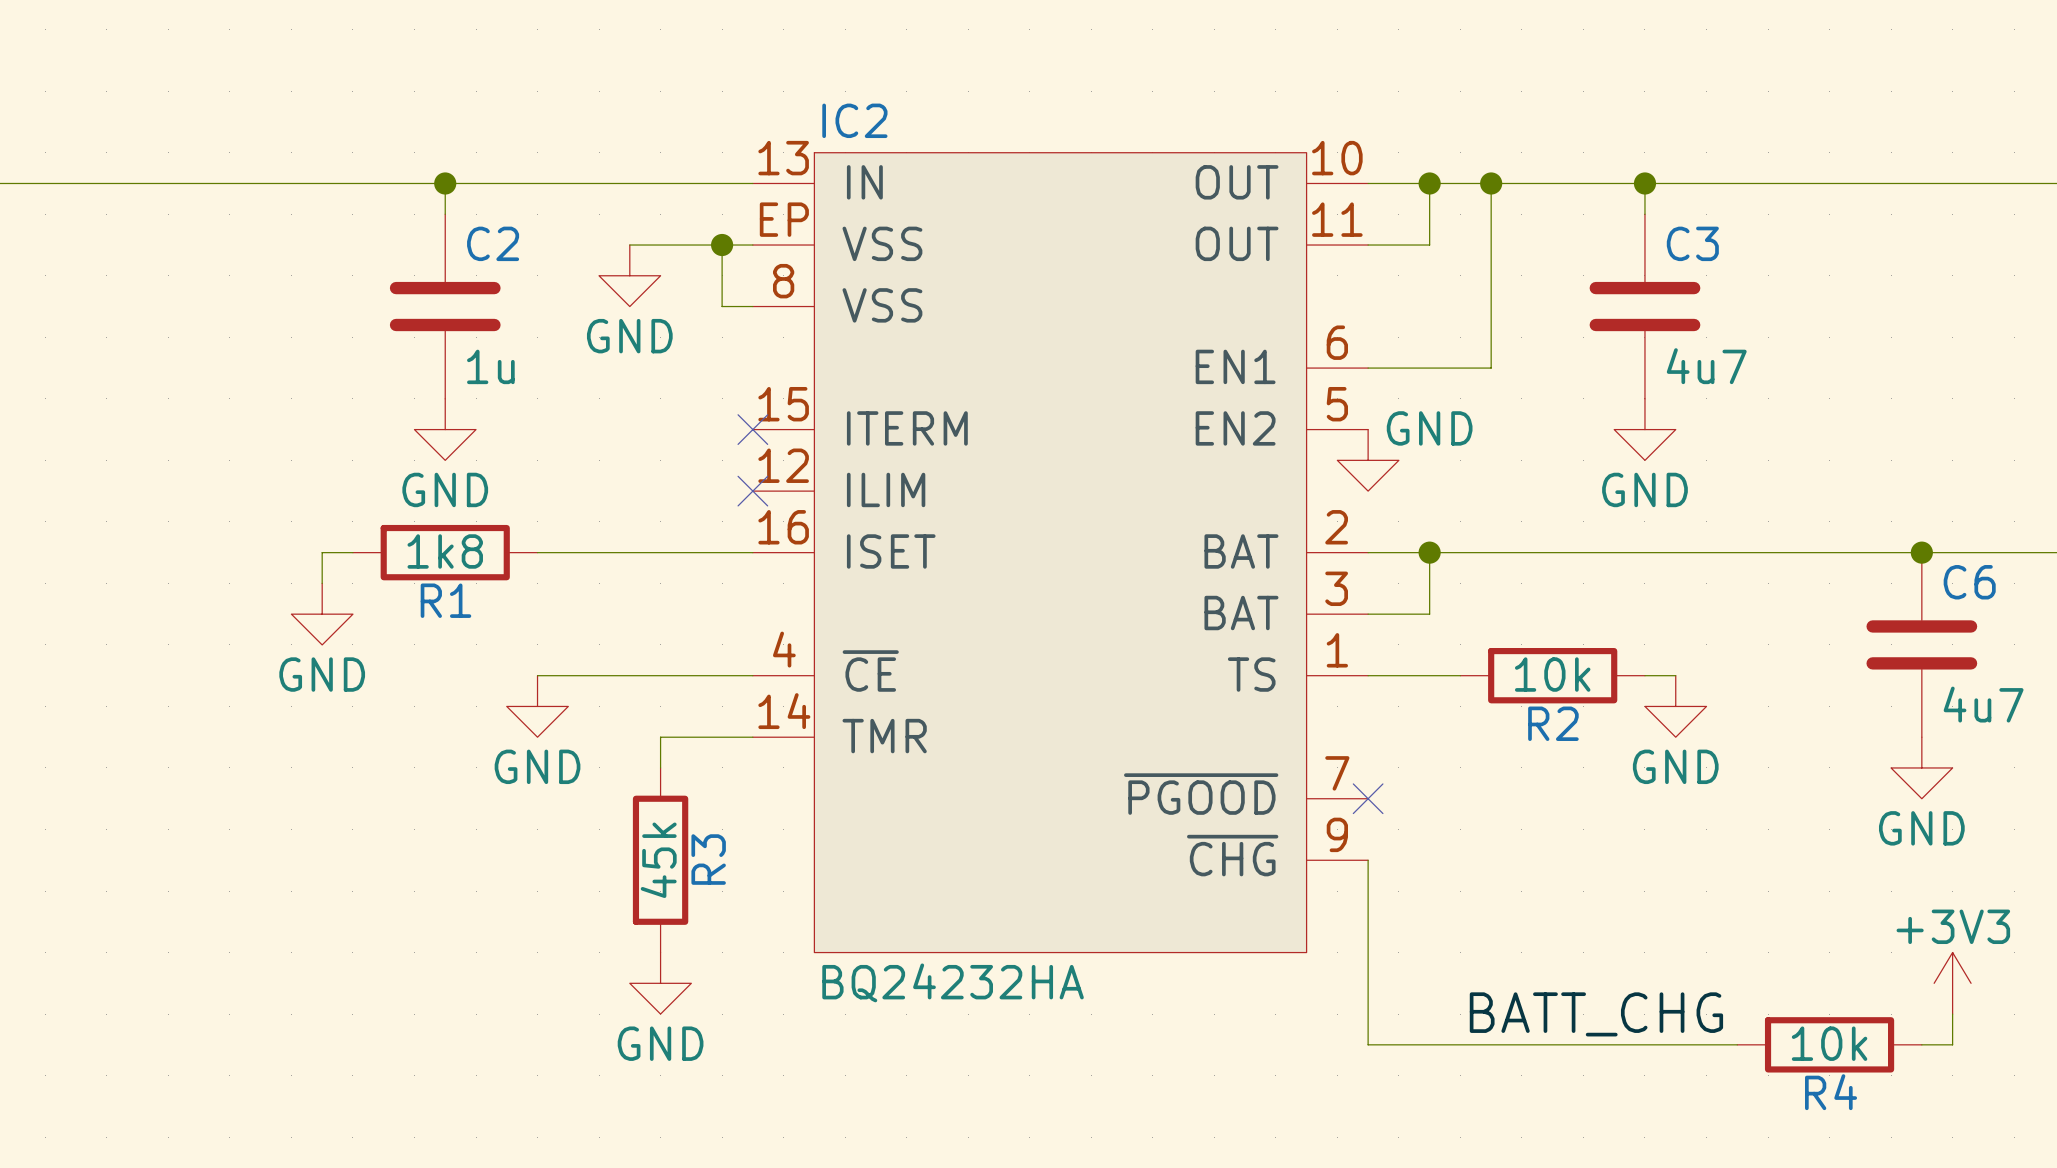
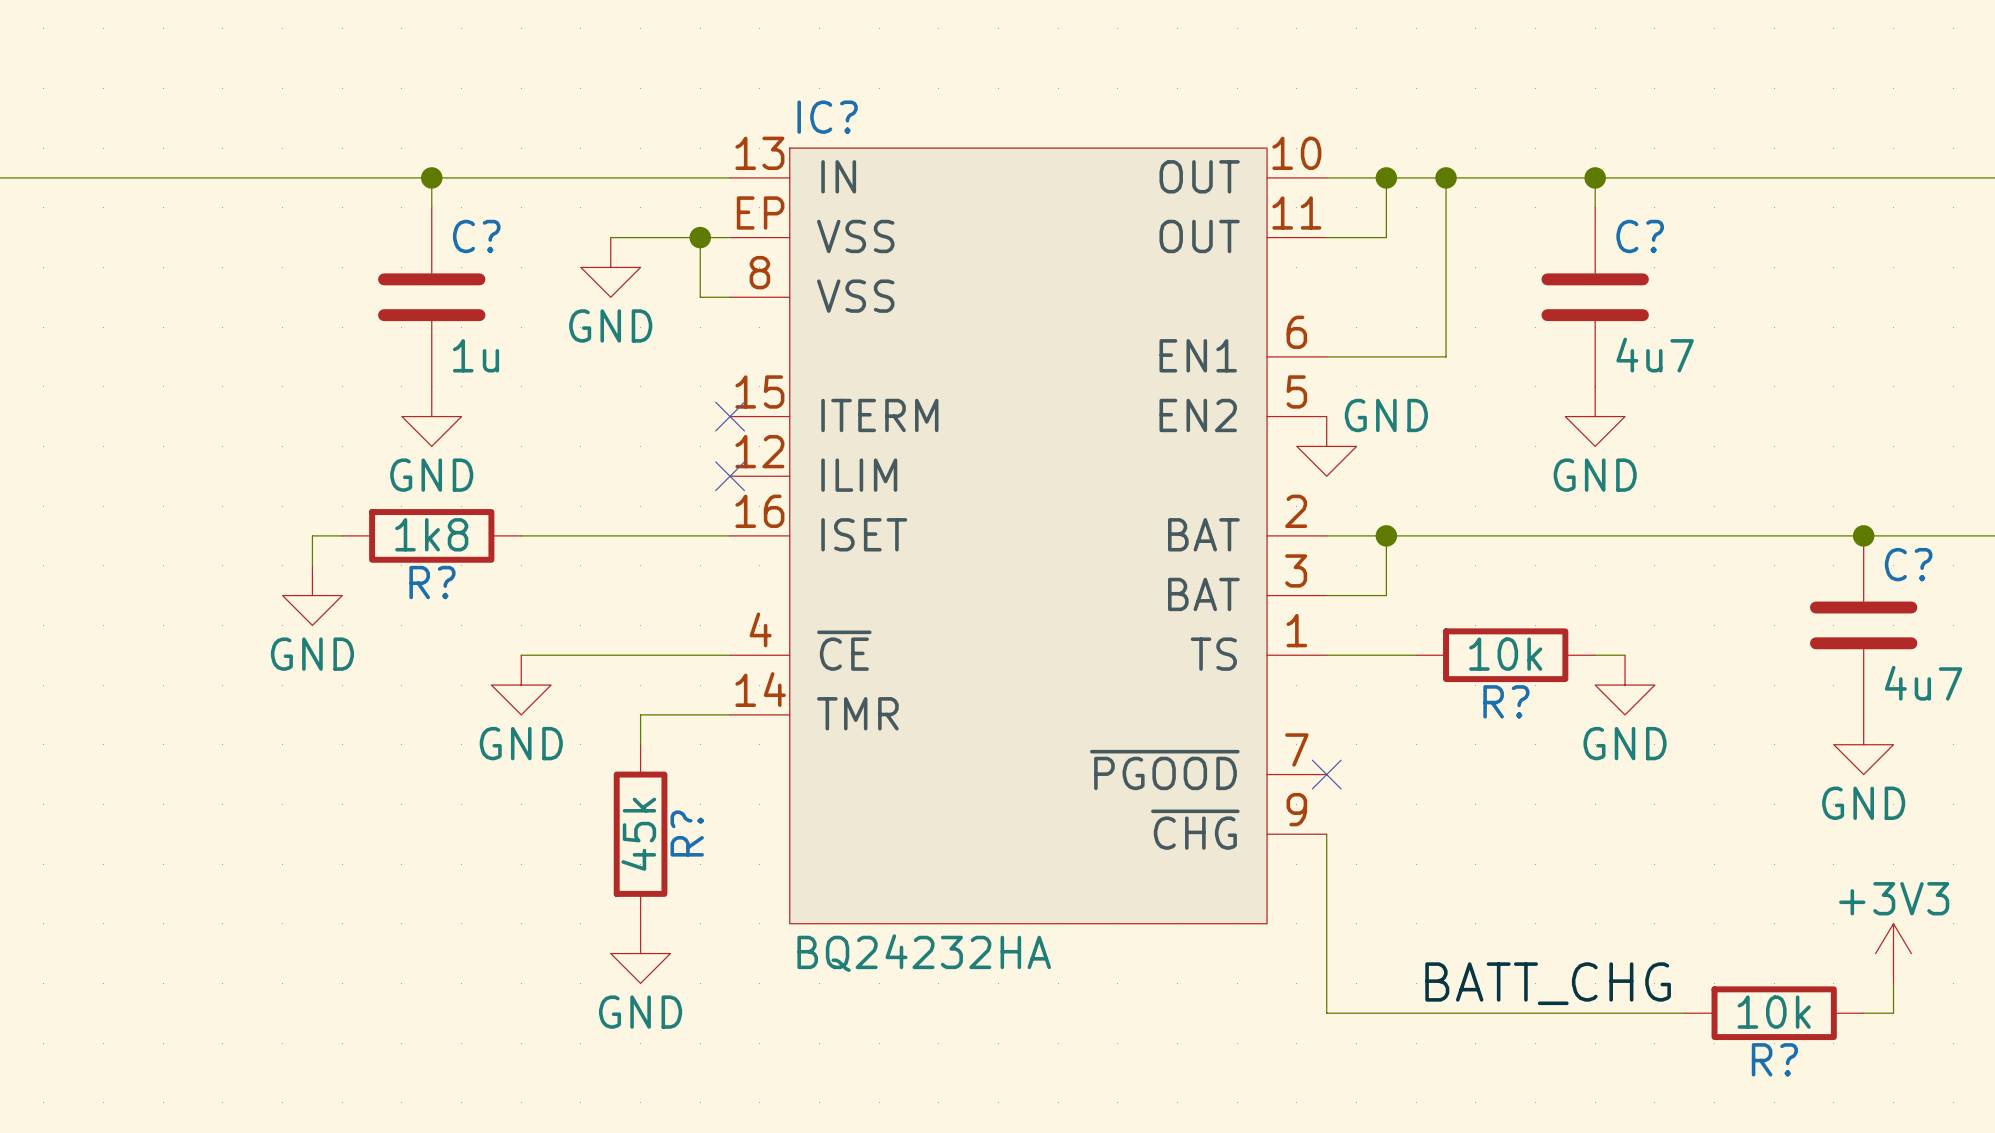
IC2 name: IC2 (854, 120) -> IC? (827, 117)
C2 name: C2 (493, 243) -> C? (476, 236)
C3 name: C3 (1692, 243) -> C? (1640, 236)
C6 name: C6 (1969, 582) -> C? (1908, 564)
R1 name: R1 (445, 600) -> R? (432, 582)
R2 name: R2 (1553, 723) -> R? (1506, 701)
R3 name: R3 (708, 859) -> R? (687, 833)
R4 name: R4 (1831, 1092) -> R? (1774, 1059)

